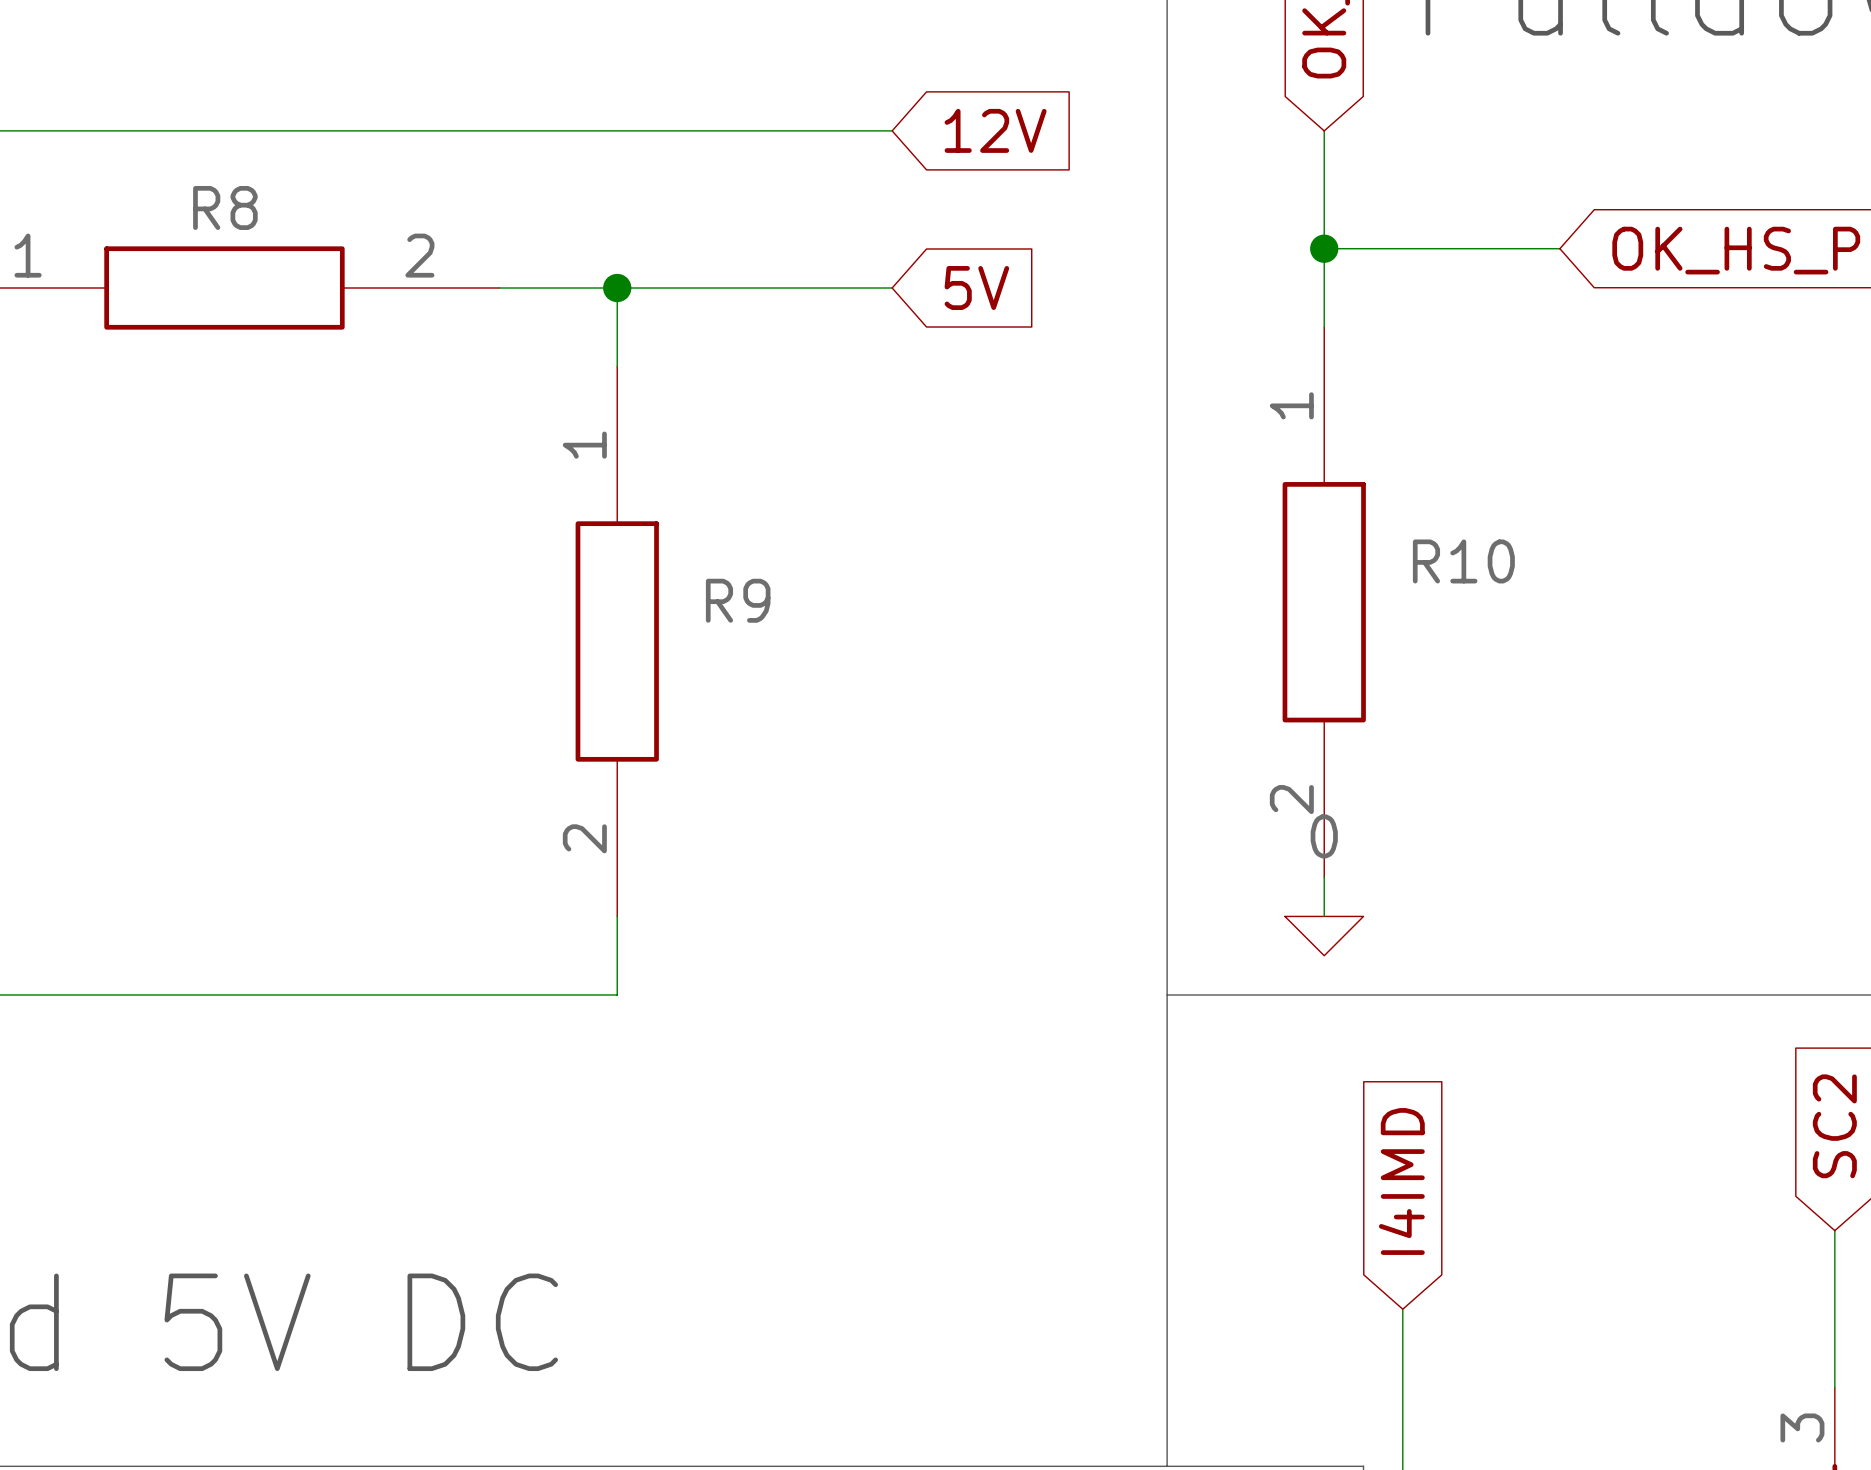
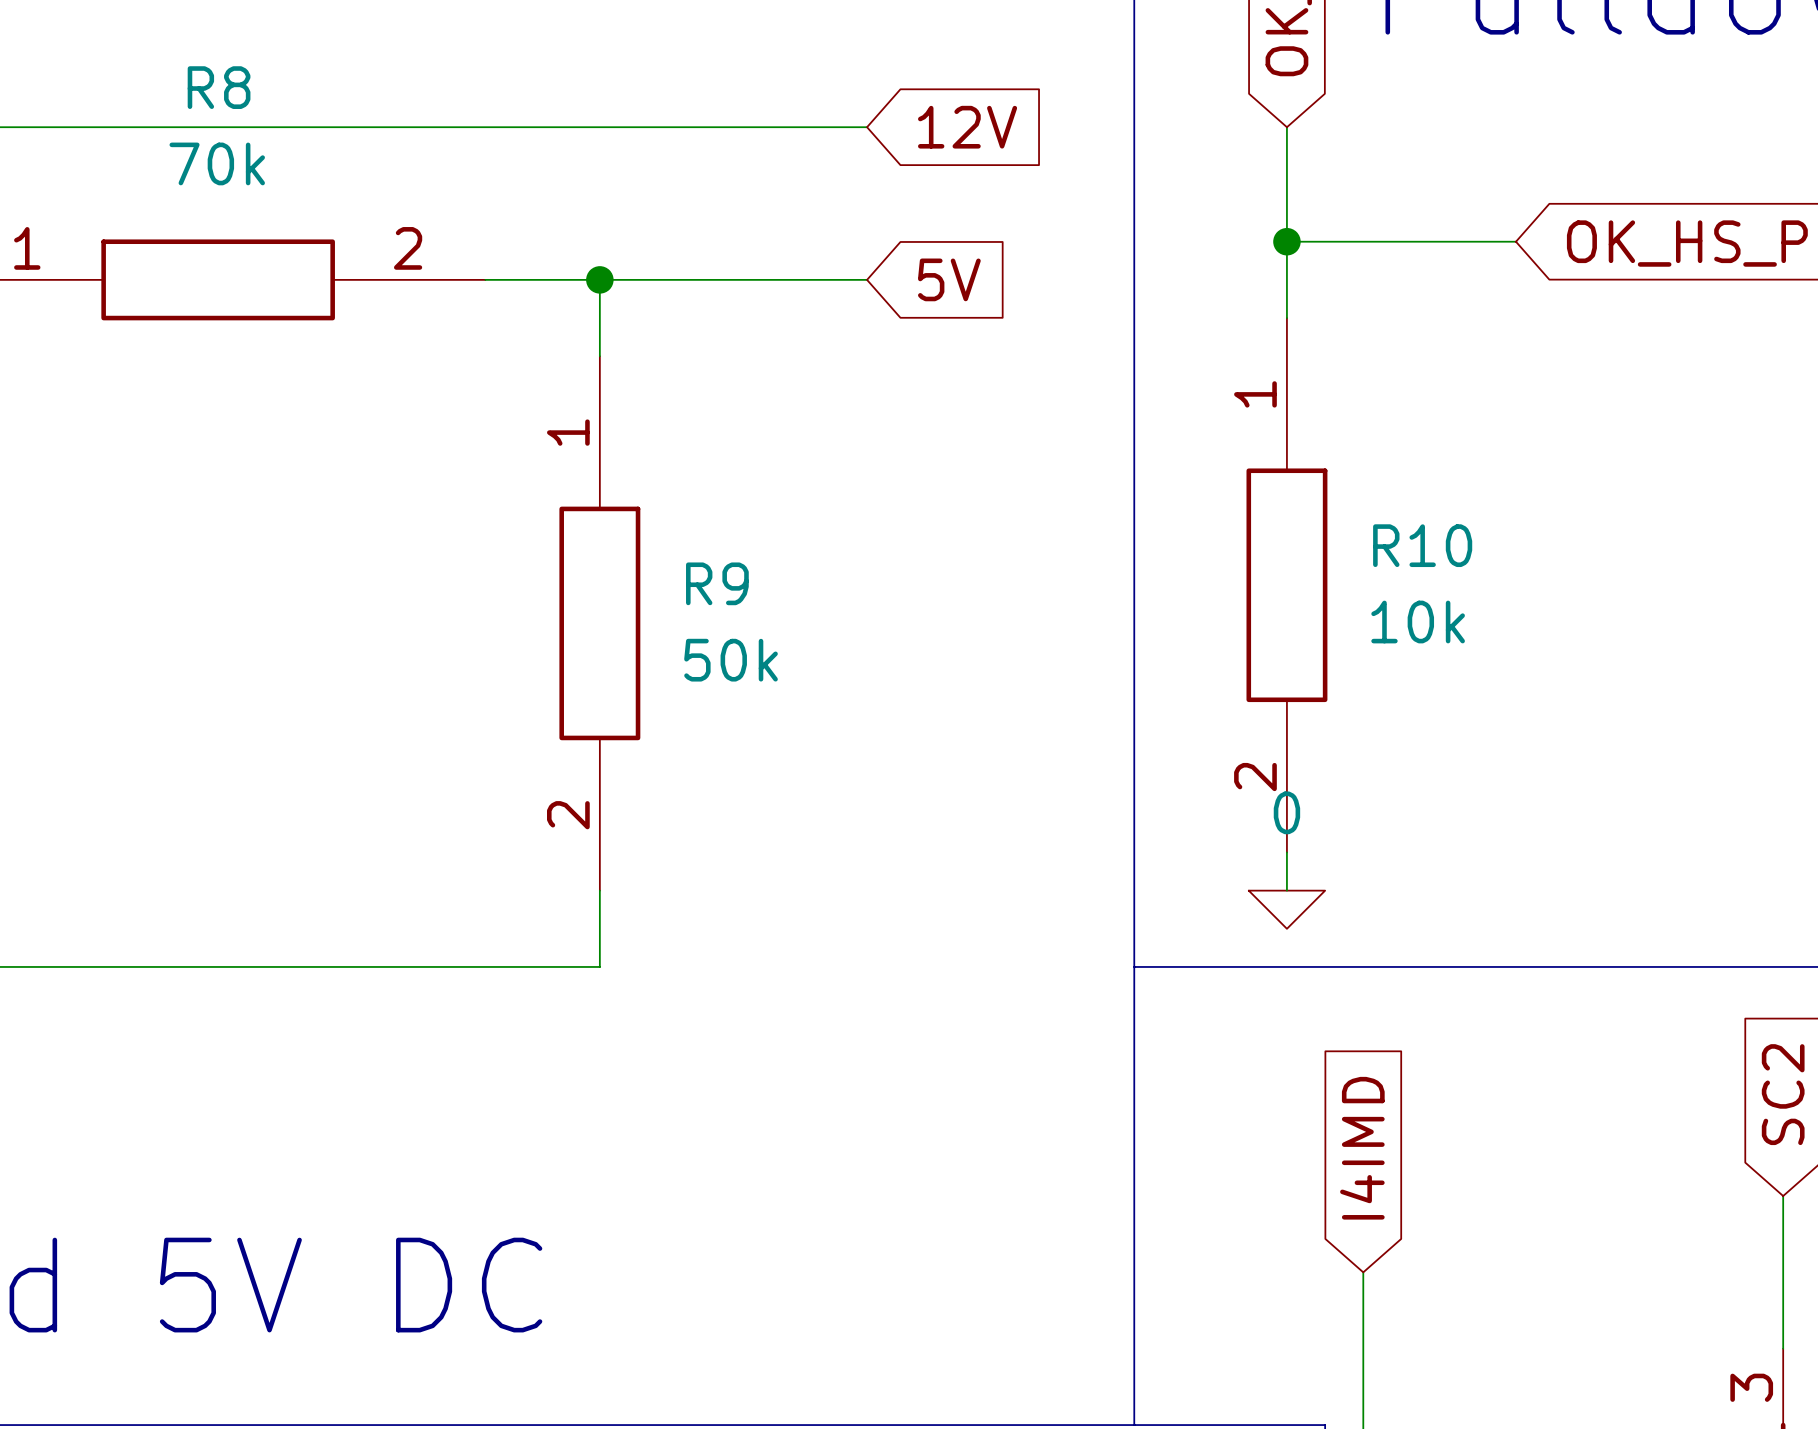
R8 text: none -> 70k (217, 163)
R8 name position: R8 (225, 207) -> R8 (219, 87)
R10 text: none -> 10k (1418, 622)
R9 text: none -> 50k (731, 660)

